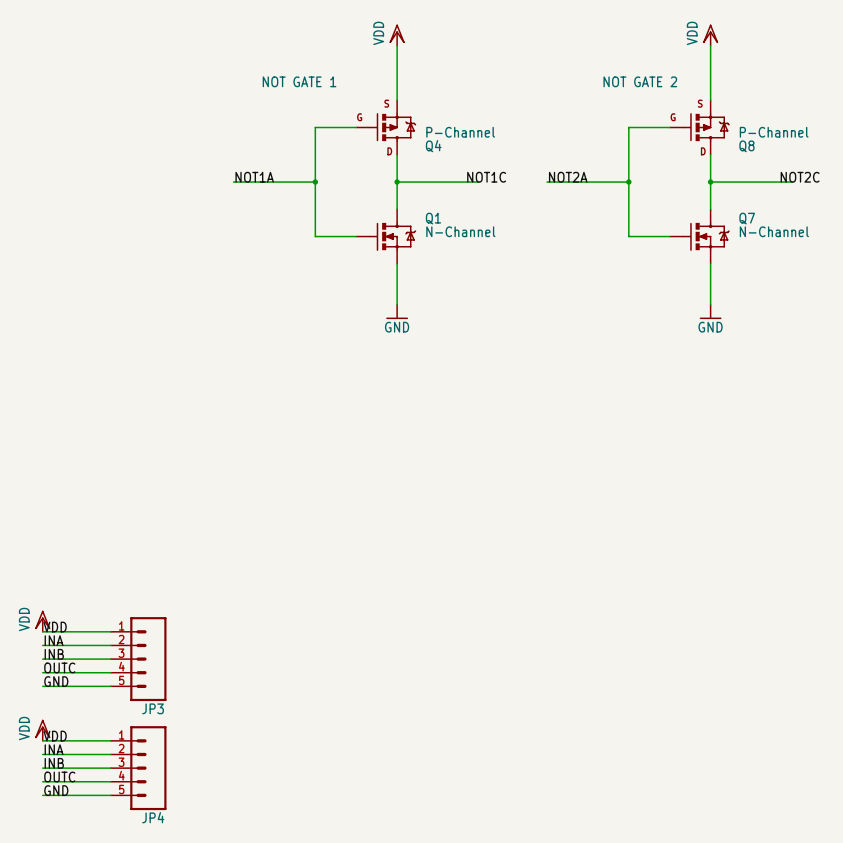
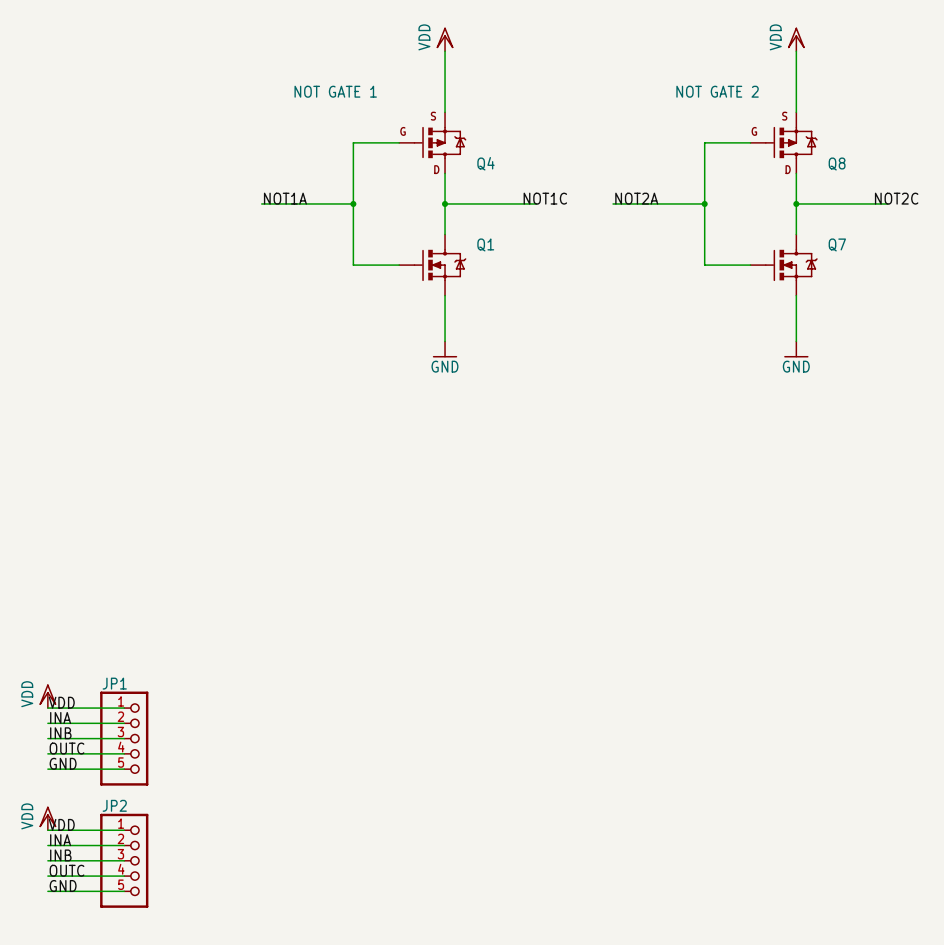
Q4 value: P-Channel (460, 132) -> none
Q8 value: P-Channel (774, 132) -> none
Q1 value: N-Channel (460, 231) -> none
Q7 value: N-Channel (774, 231) -> none
JP1: none -> (124, 738)
JP3: (138, 659) -> none
JP2: none -> (124, 860)
JP4: (138, 768) -> none

